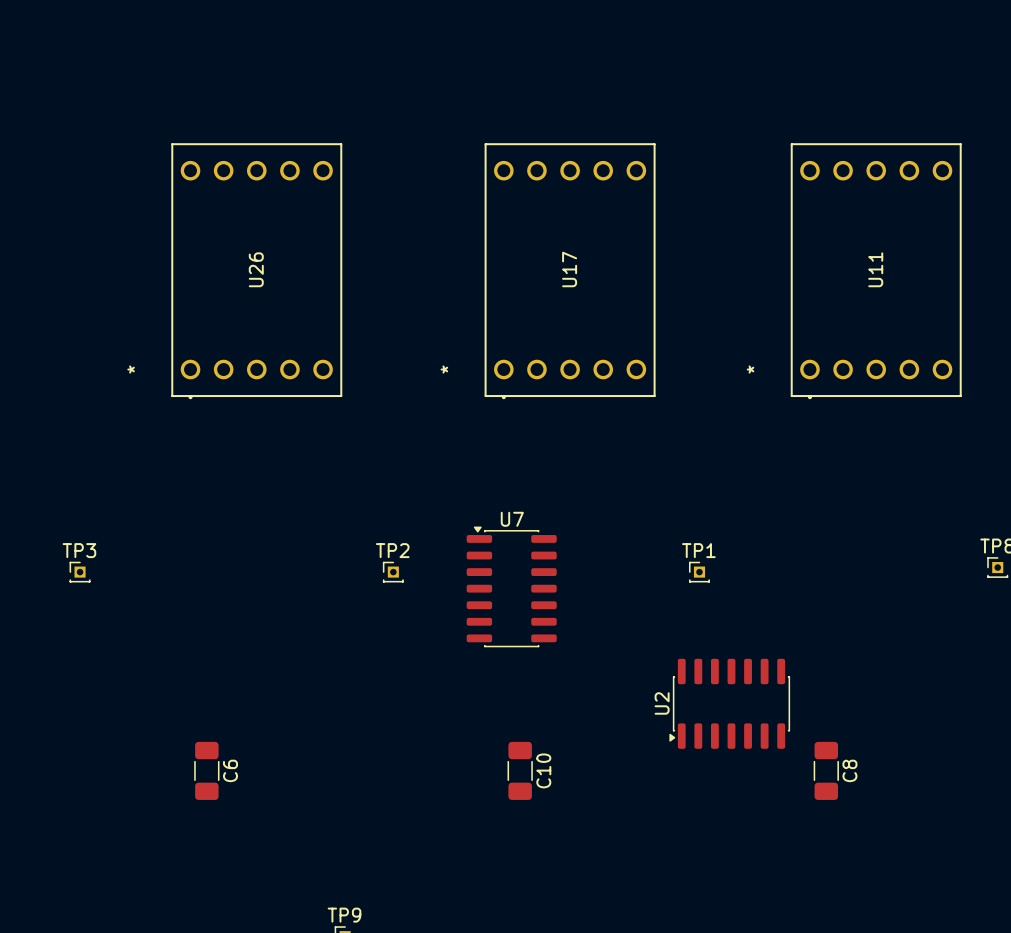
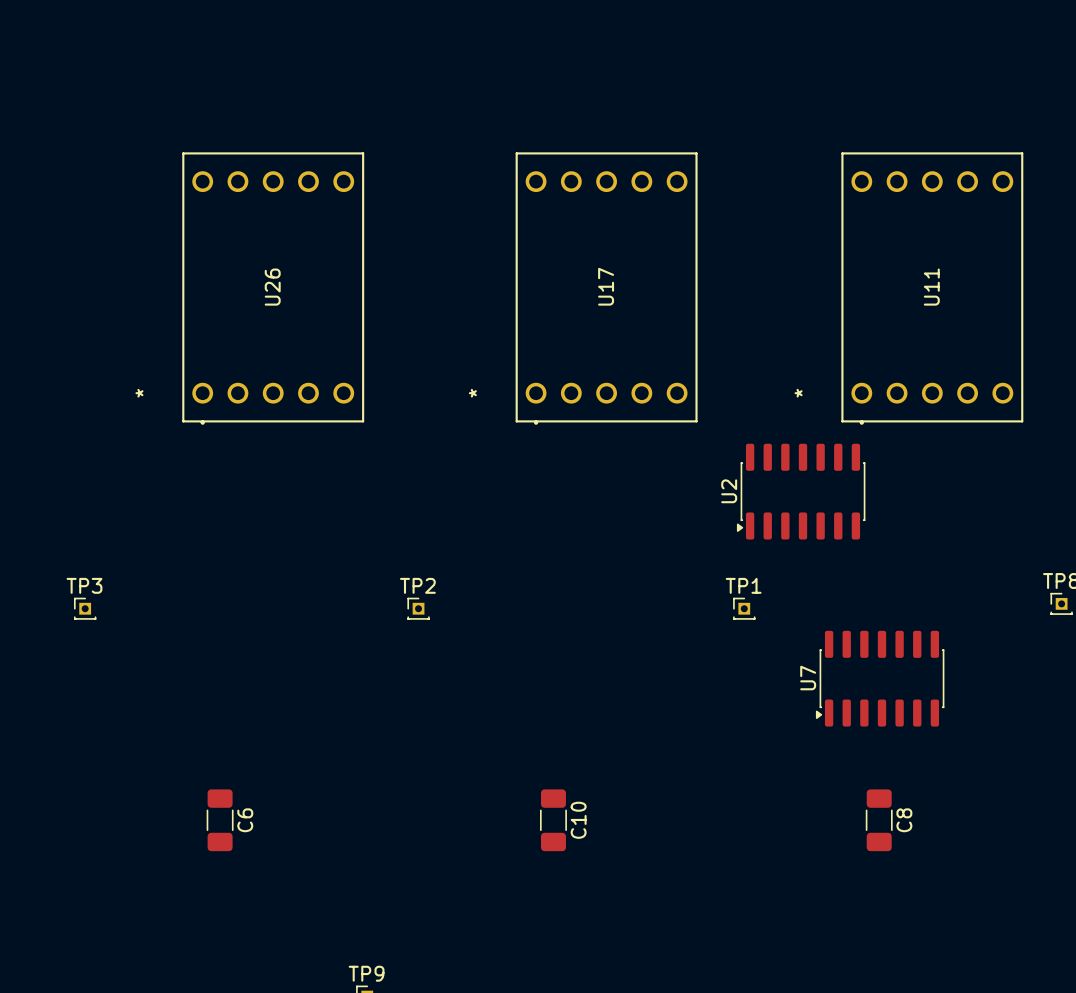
U7 rotation: 0° (511, 586) -> 90° counterclockwise (880, 678)
U7 position: (511, 586) -> (880, 678)
U2 position: (729, 703) -> (801, 491)

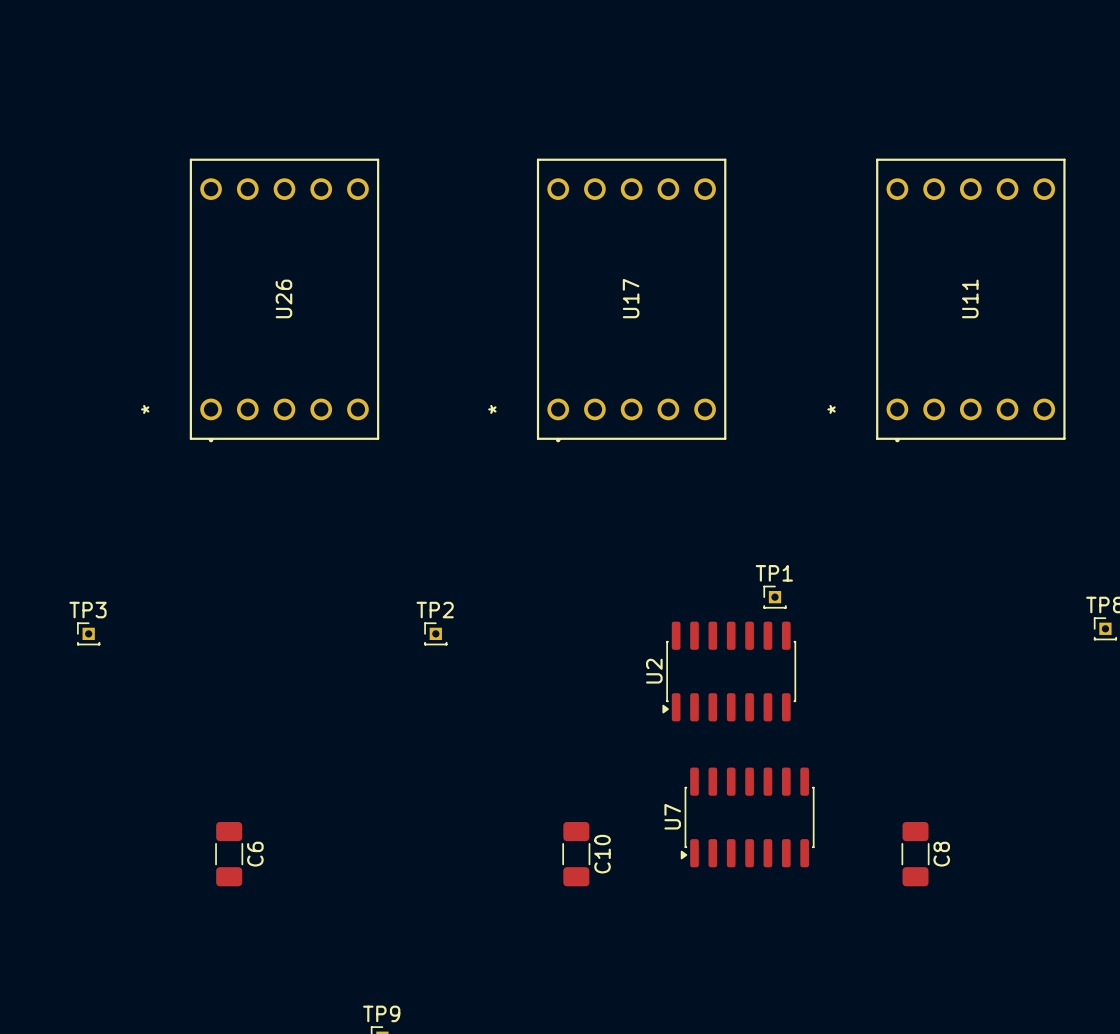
U2 position: (801, 491) -> (729, 671)
TP1 position: (744, 608) -> (775, 597)
U7 position: (880, 678) -> (747, 817)

